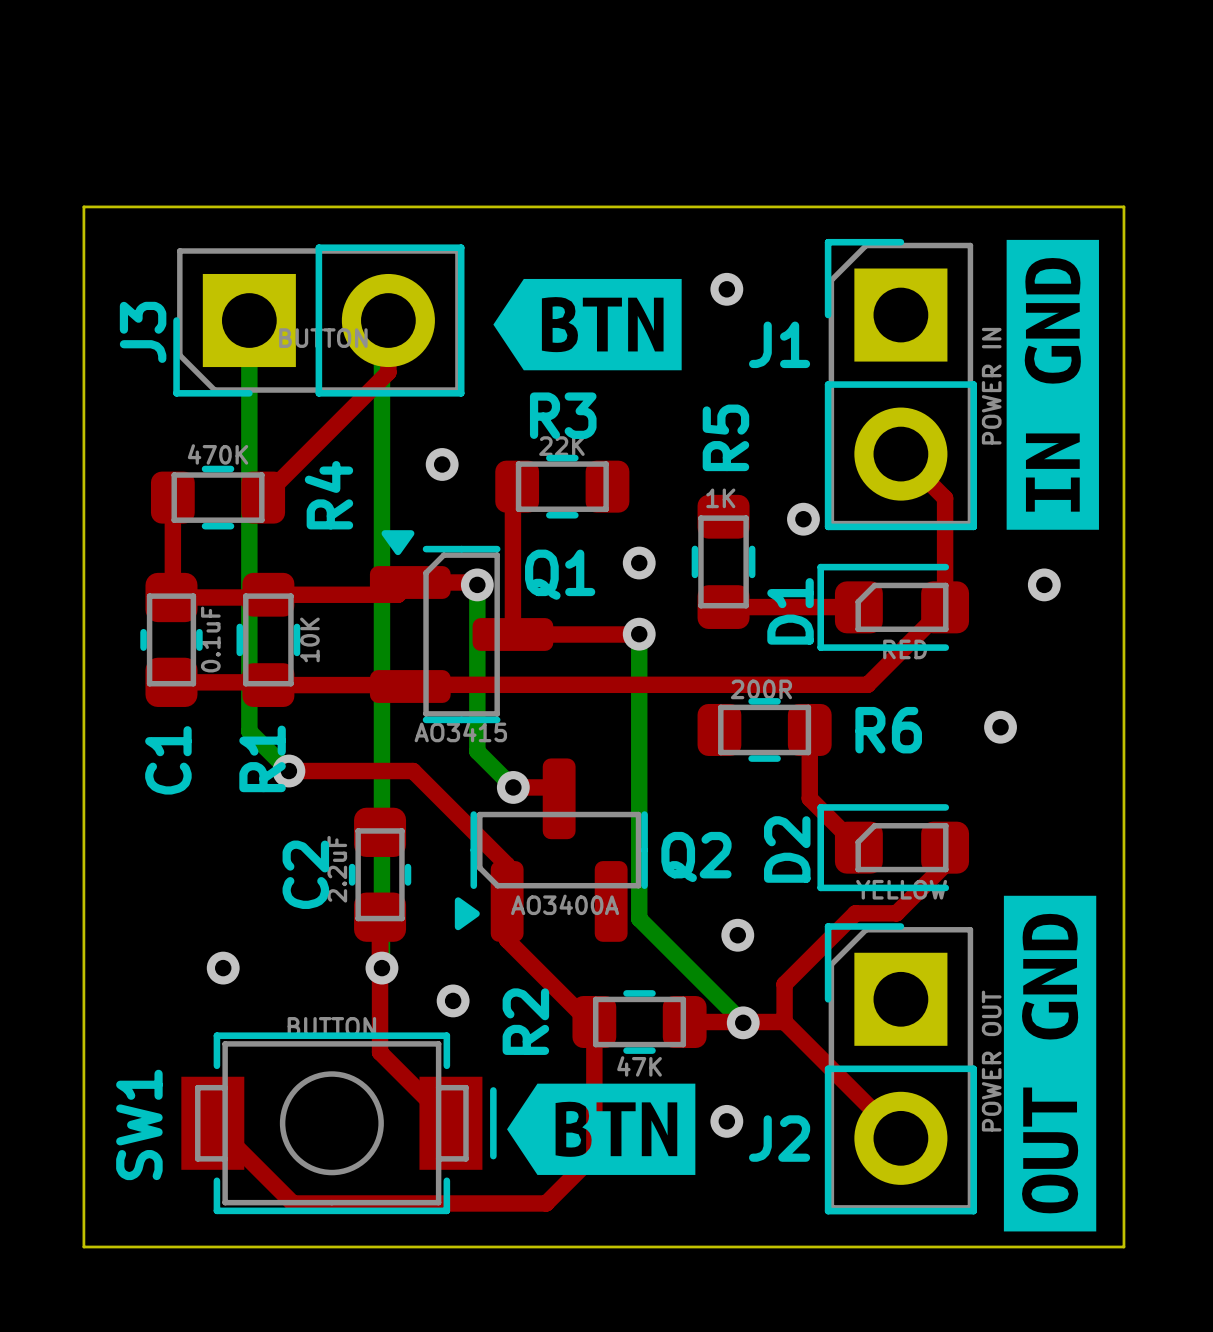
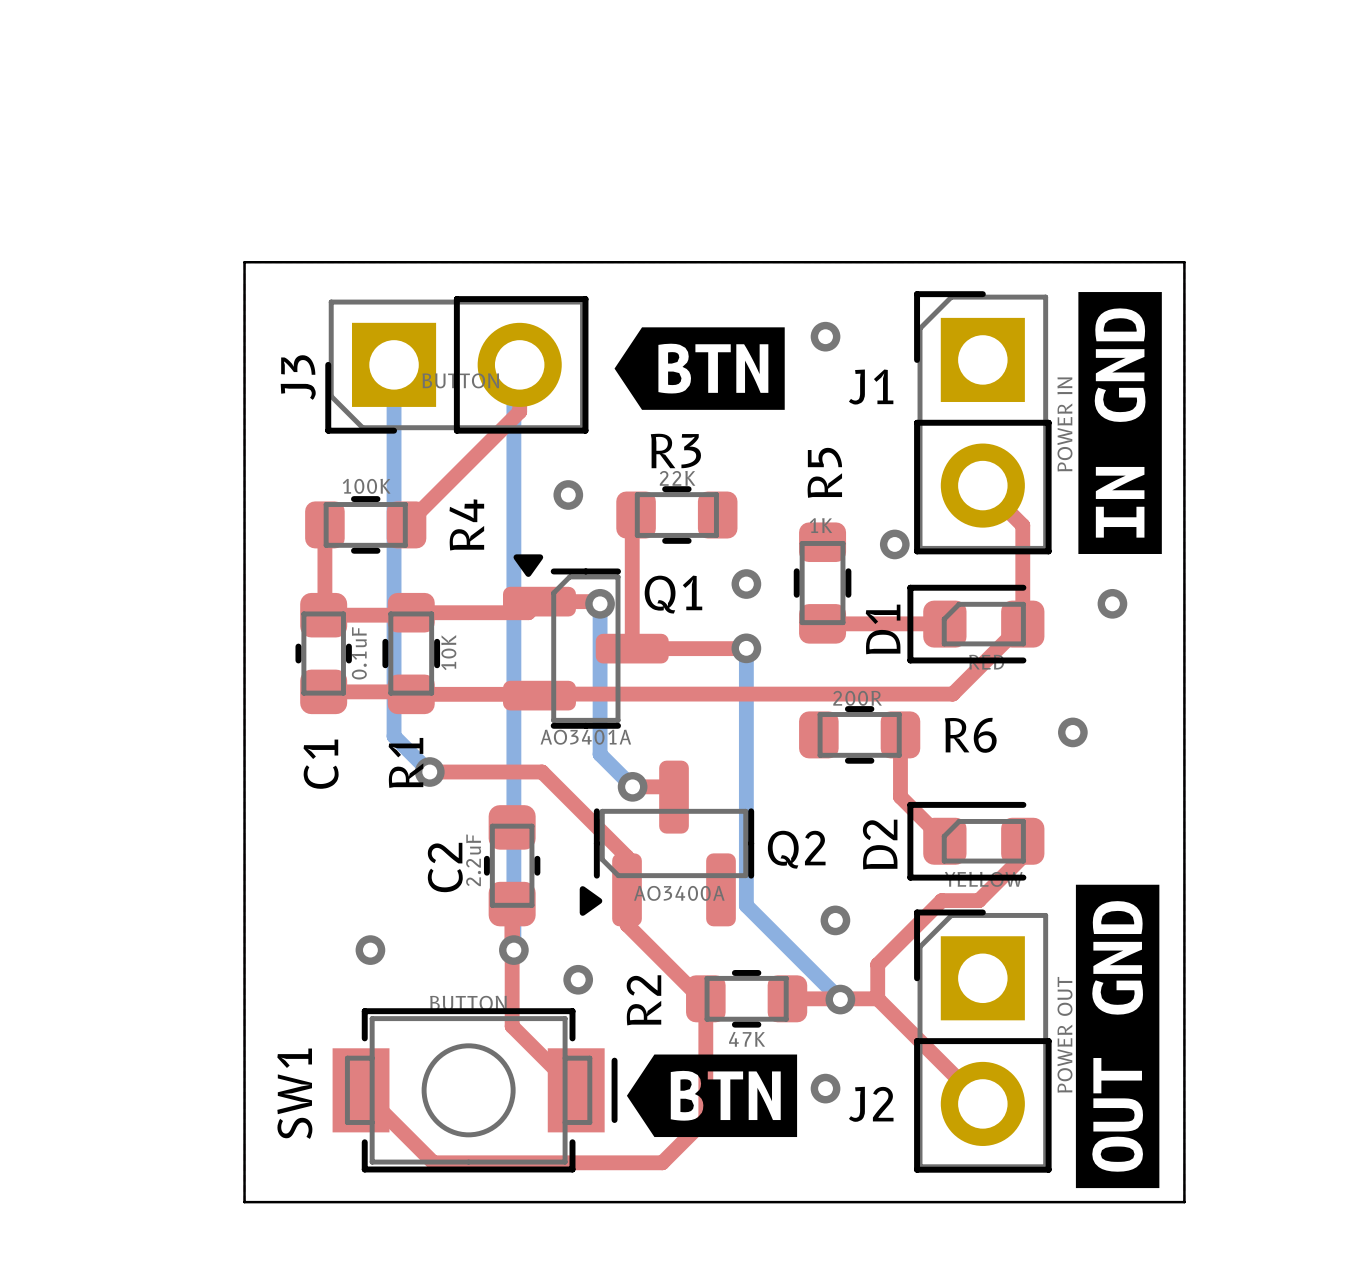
R4 value: 470K (218, 454) -> 100K (366, 486)
Q1 value: AO3415 (460, 732) -> AO3401A (585, 737)

